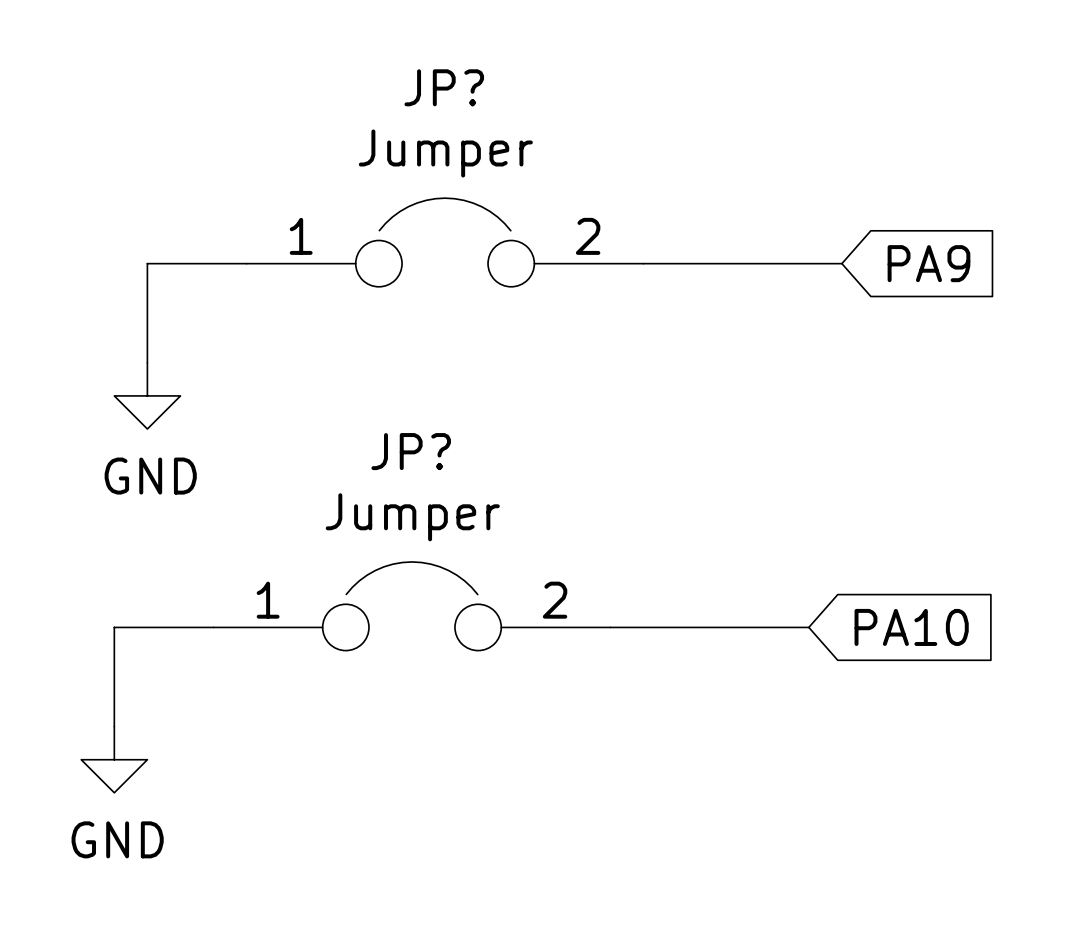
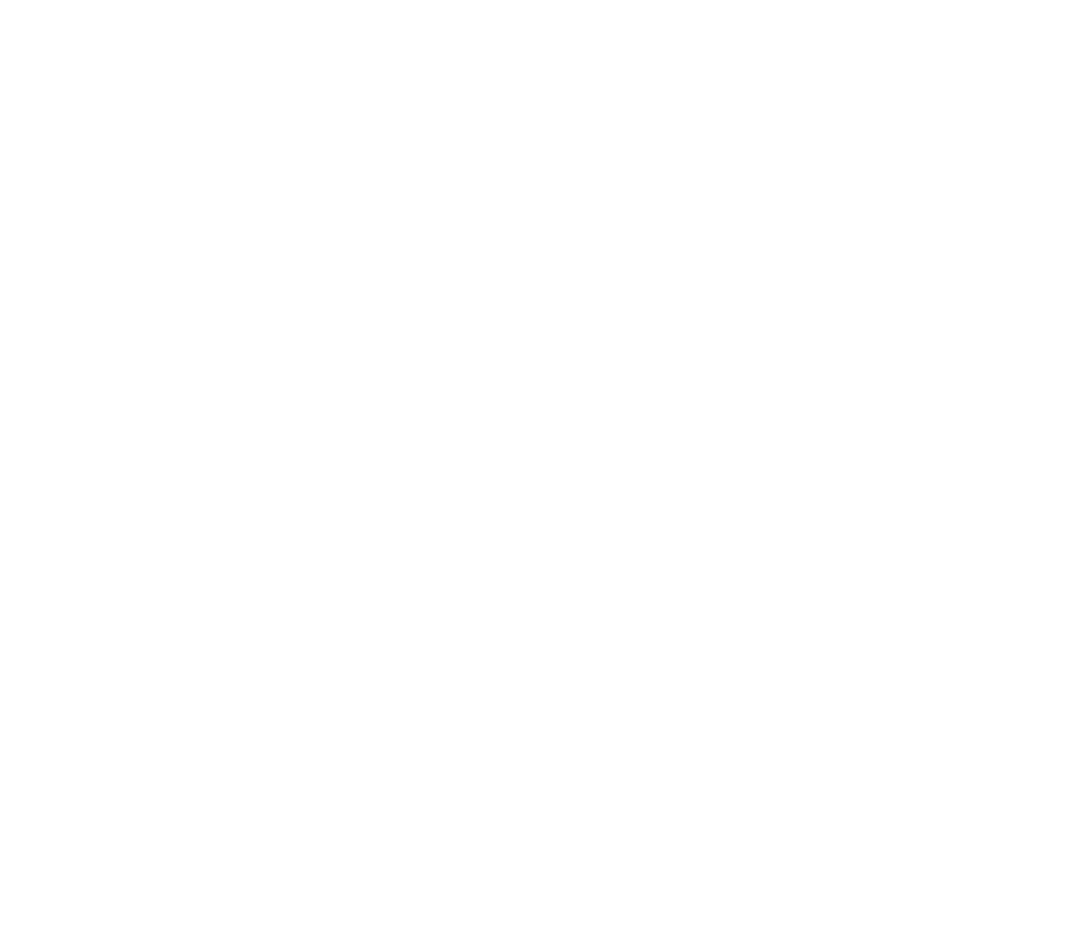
JP?: Jumper (445, 242) -> none
wire: (246, 263) (147, 263) (147, 362) -> none
wire: (643, 263) (841, 263) -> none
global label: PA9 (928, 263) -> none
power symbol: GND (147, 395) -> none
JP?: Jumper (411, 606) -> none
wire: (213, 627) (114, 627) (114, 726) -> none
wire: (610, 627) (808, 627) -> none
global label: PA10 (911, 627) -> none
power symbol: GND (114, 759) -> none

